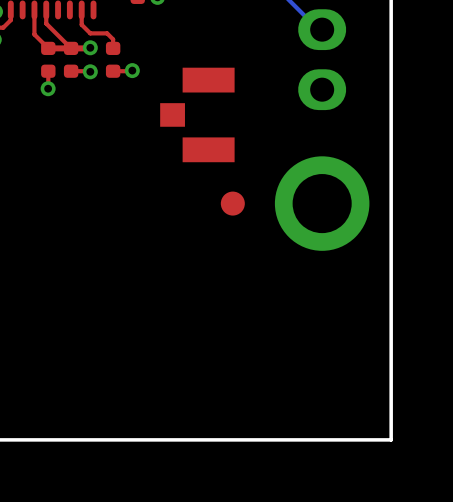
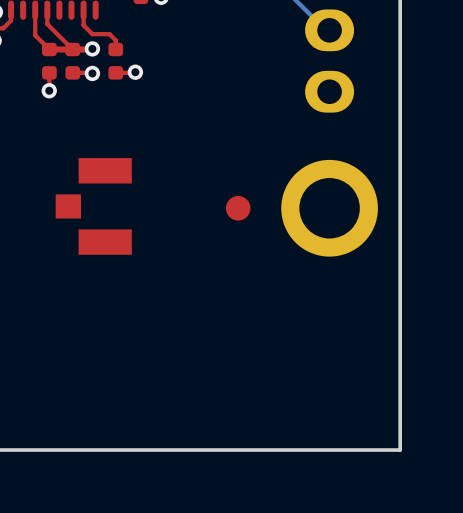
part position: (197, 114) -> (93, 206)

